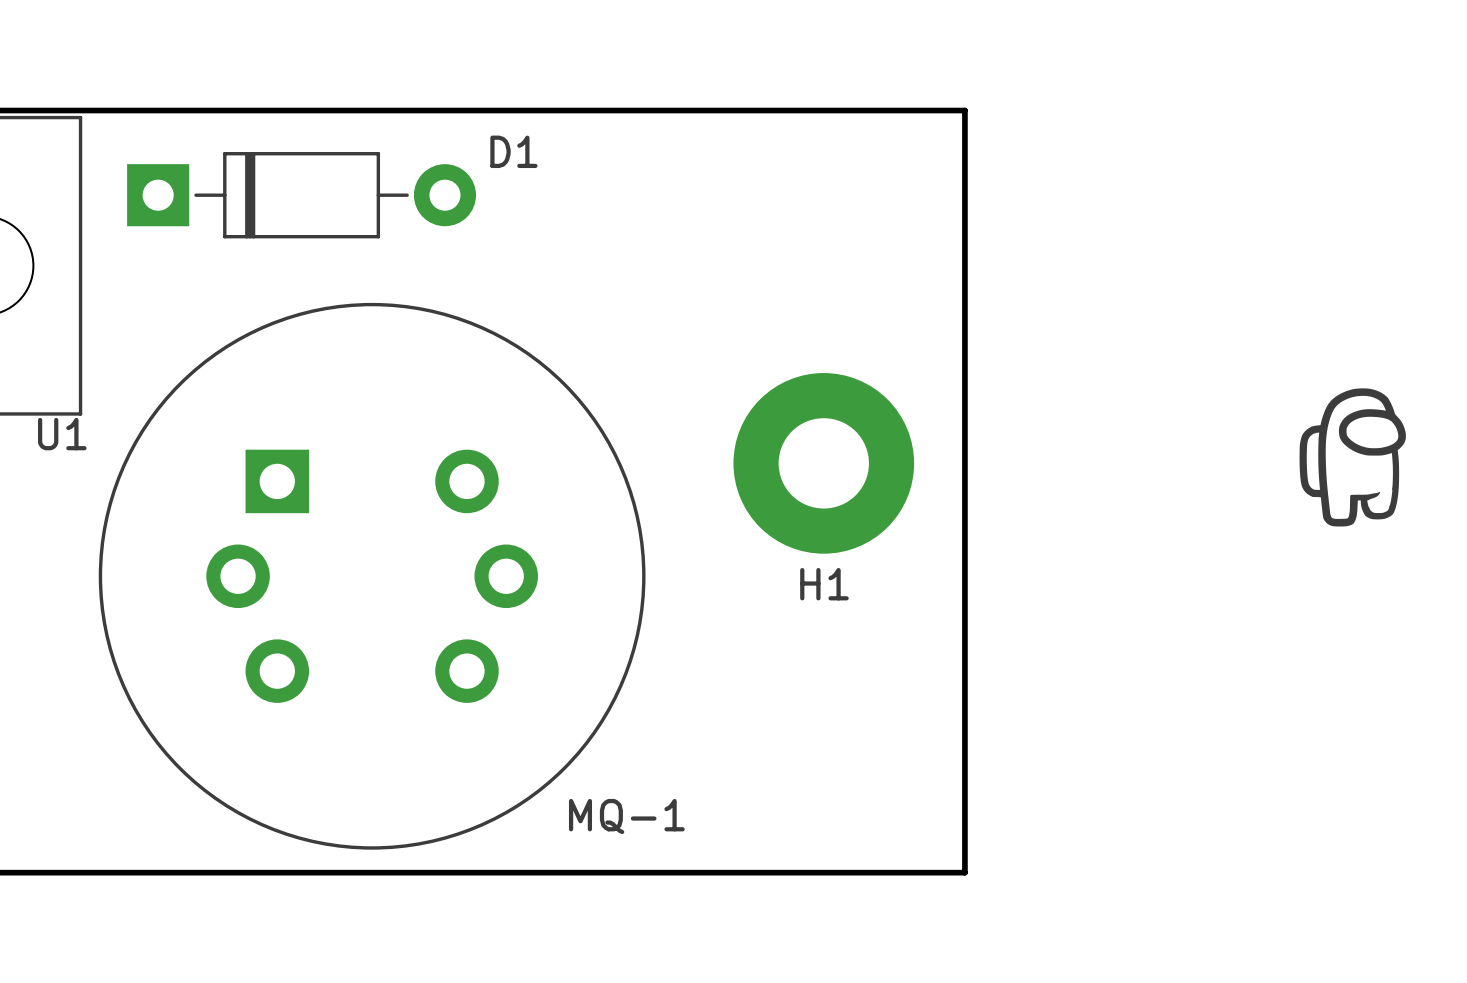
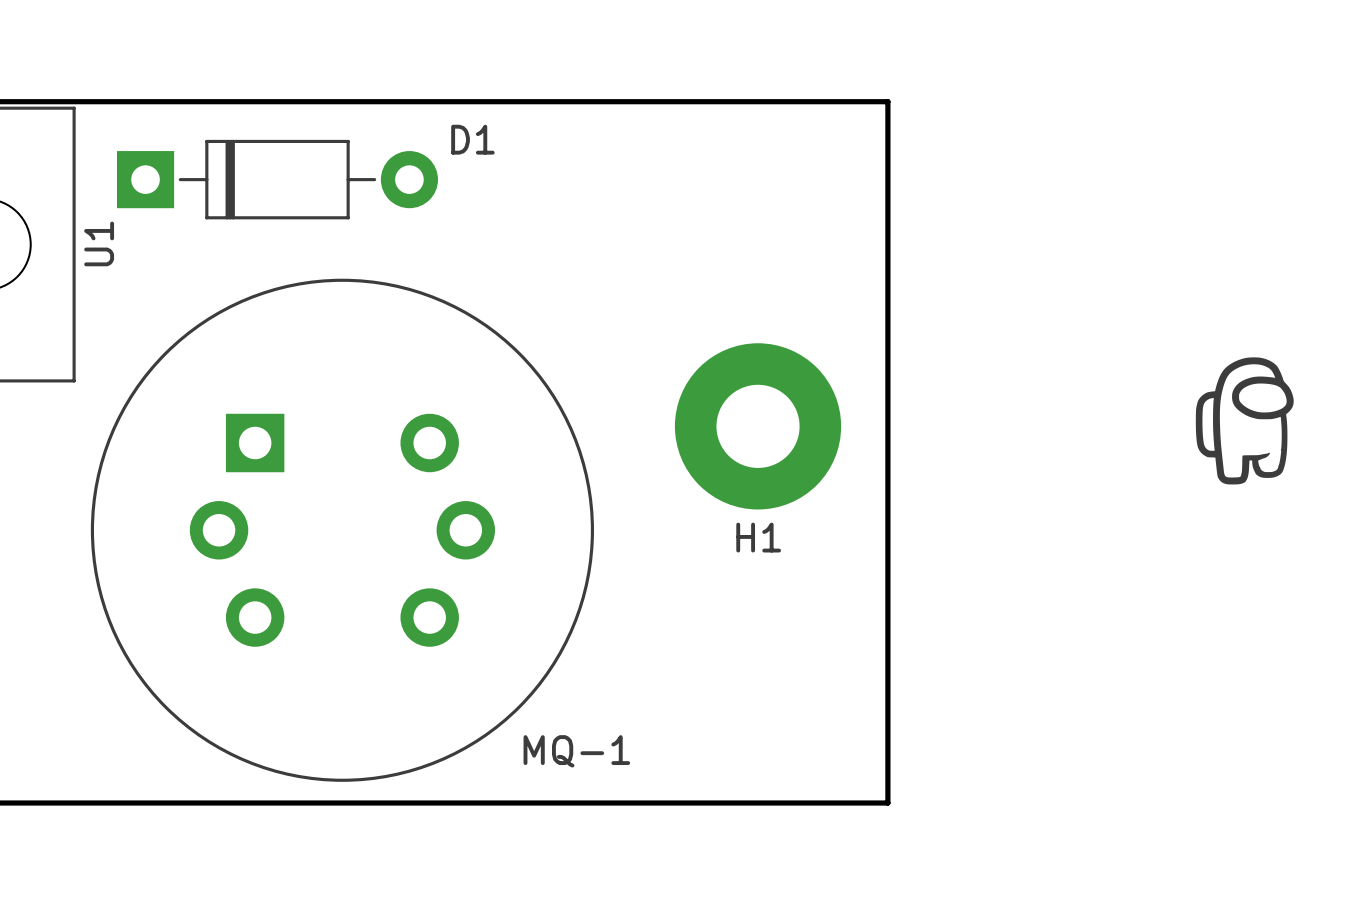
U1 name rotation: 0° (62, 434) -> 90° counterclockwise (99, 243)
U1 name position: U1 (62, 434) -> U1 (99, 243)

